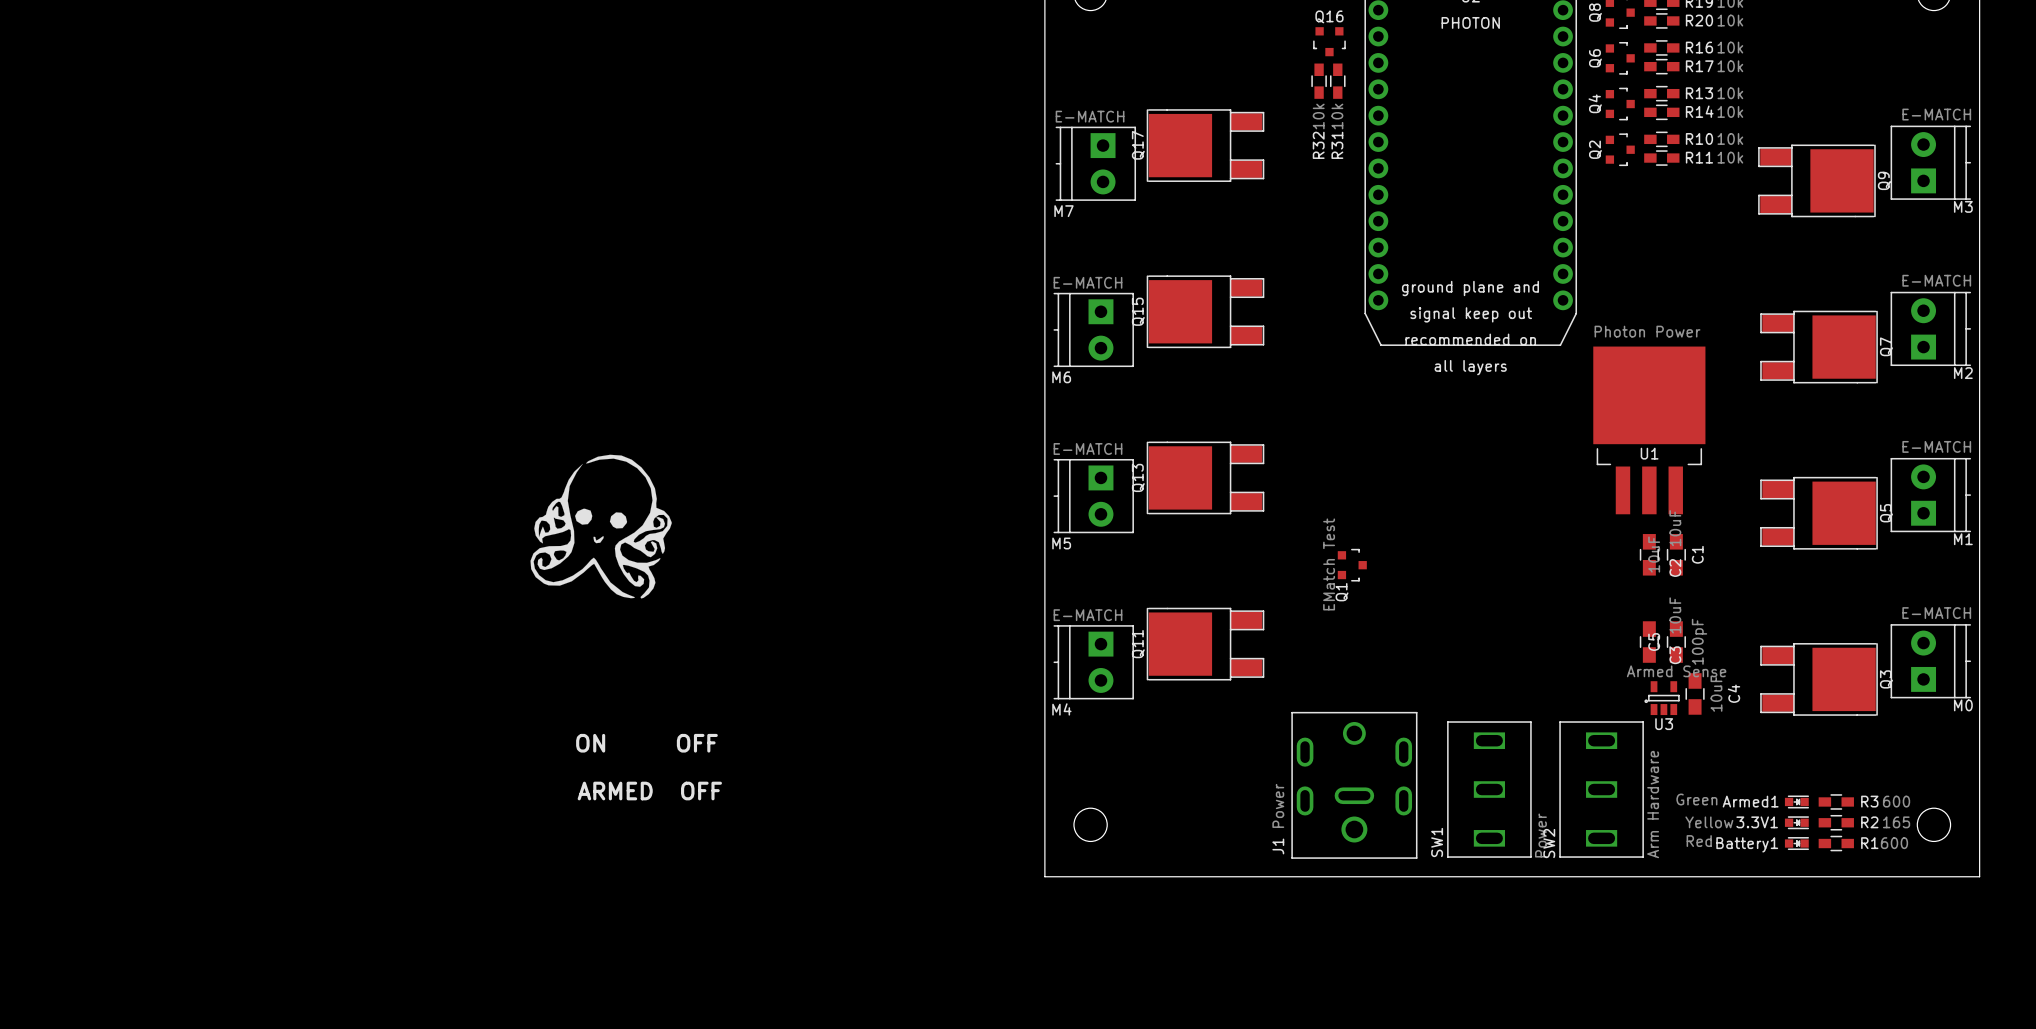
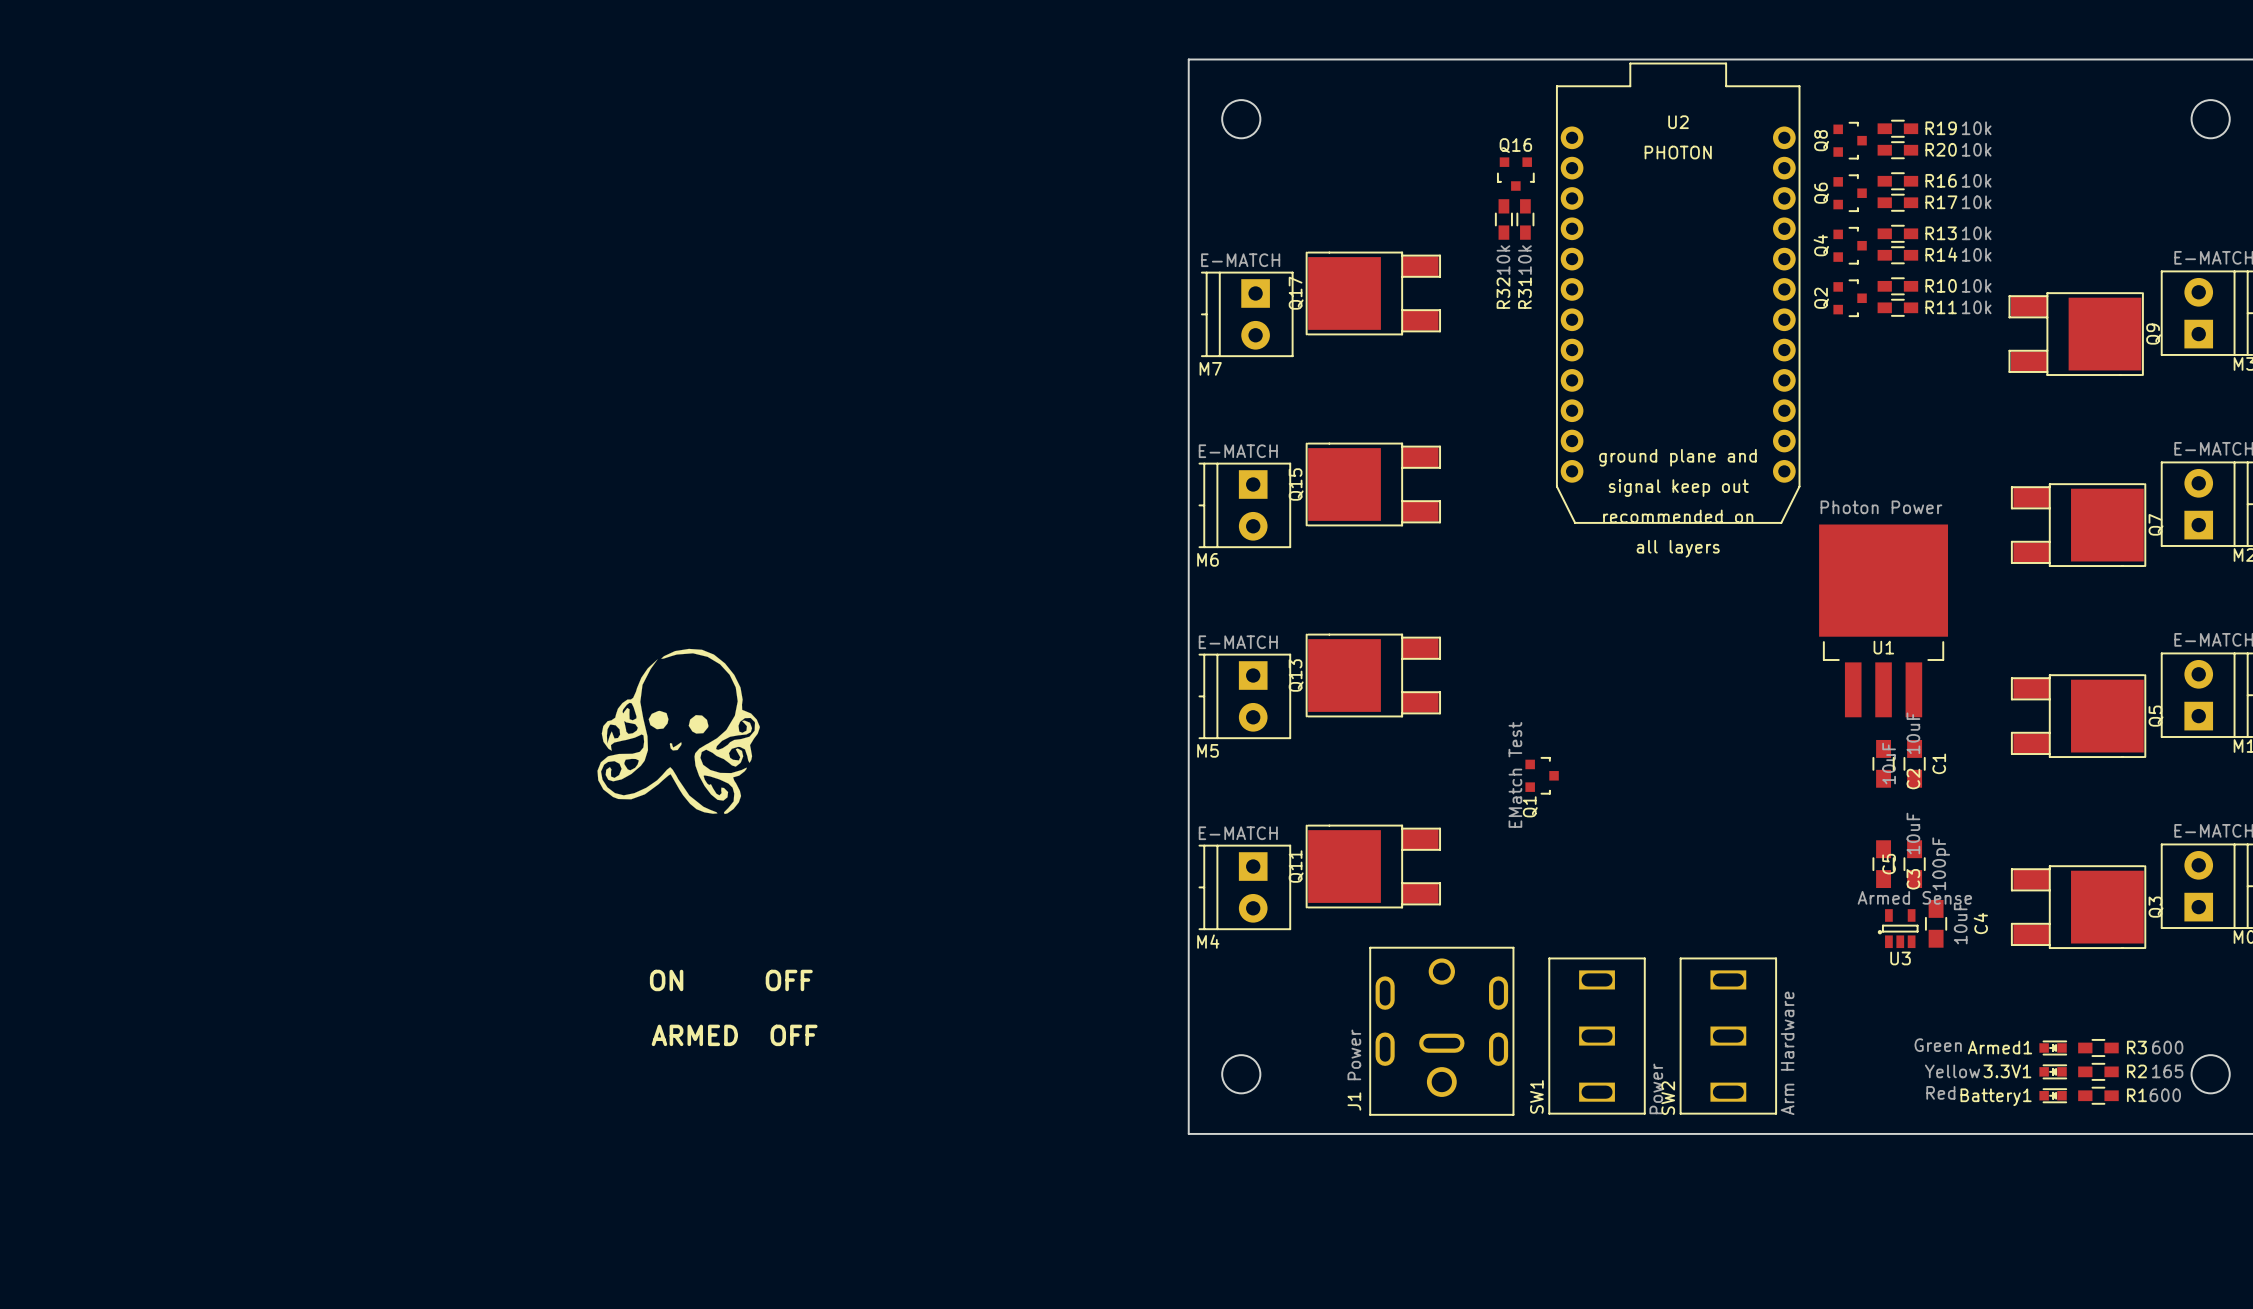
J1 position: (1354, 785) -> (1441, 1031)
SW1 position: (1489, 789) -> (1597, 1036)
SW2 position: (1601, 789) -> (1728, 1036)

